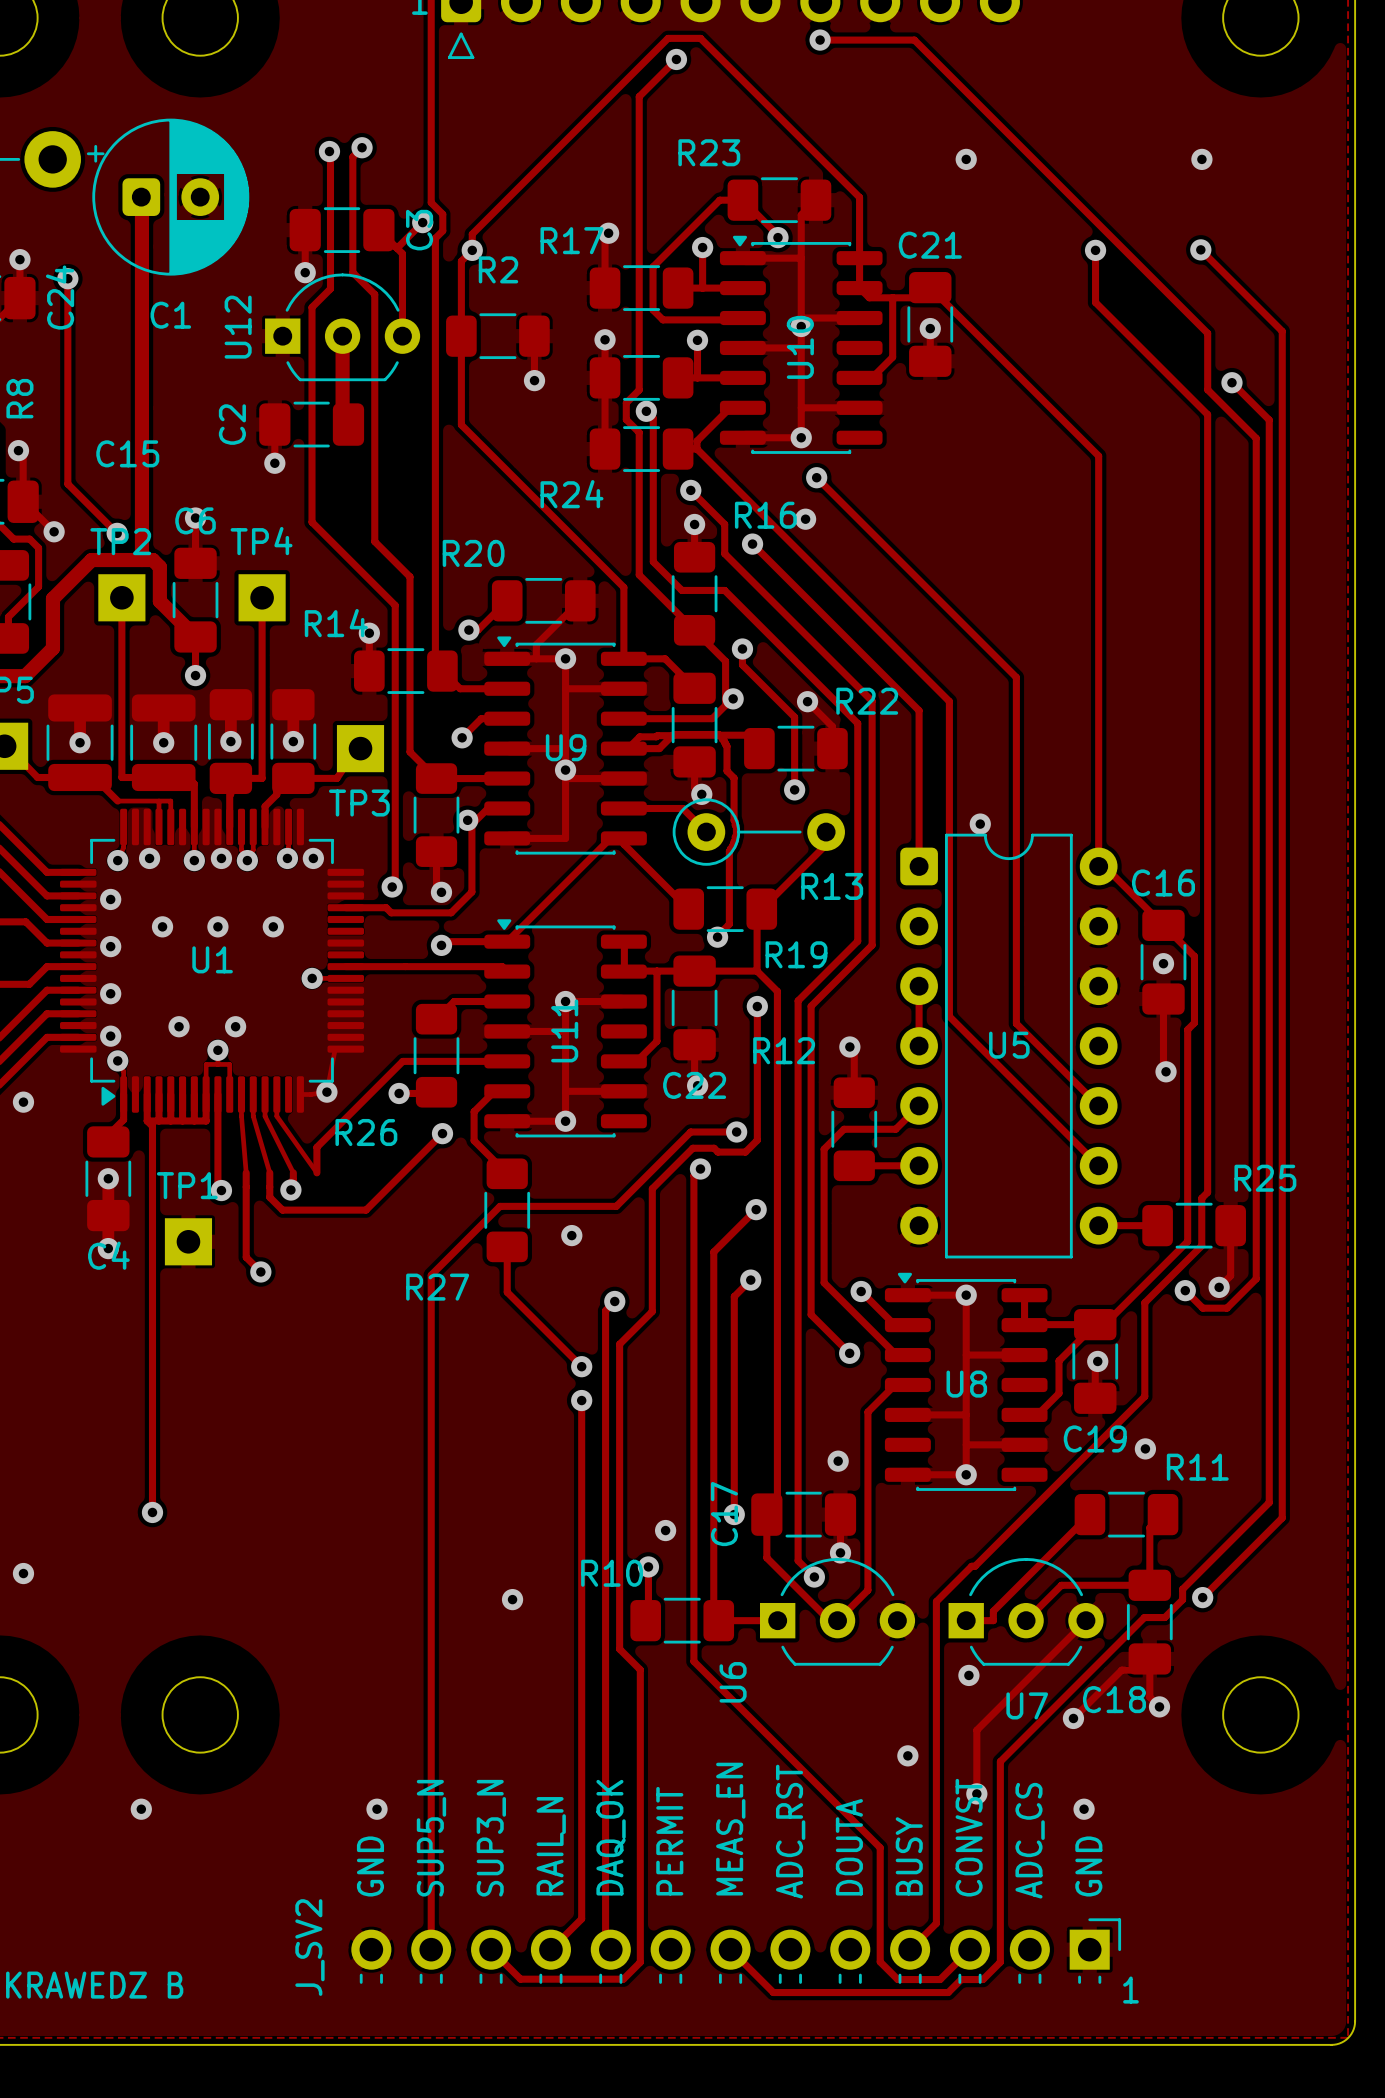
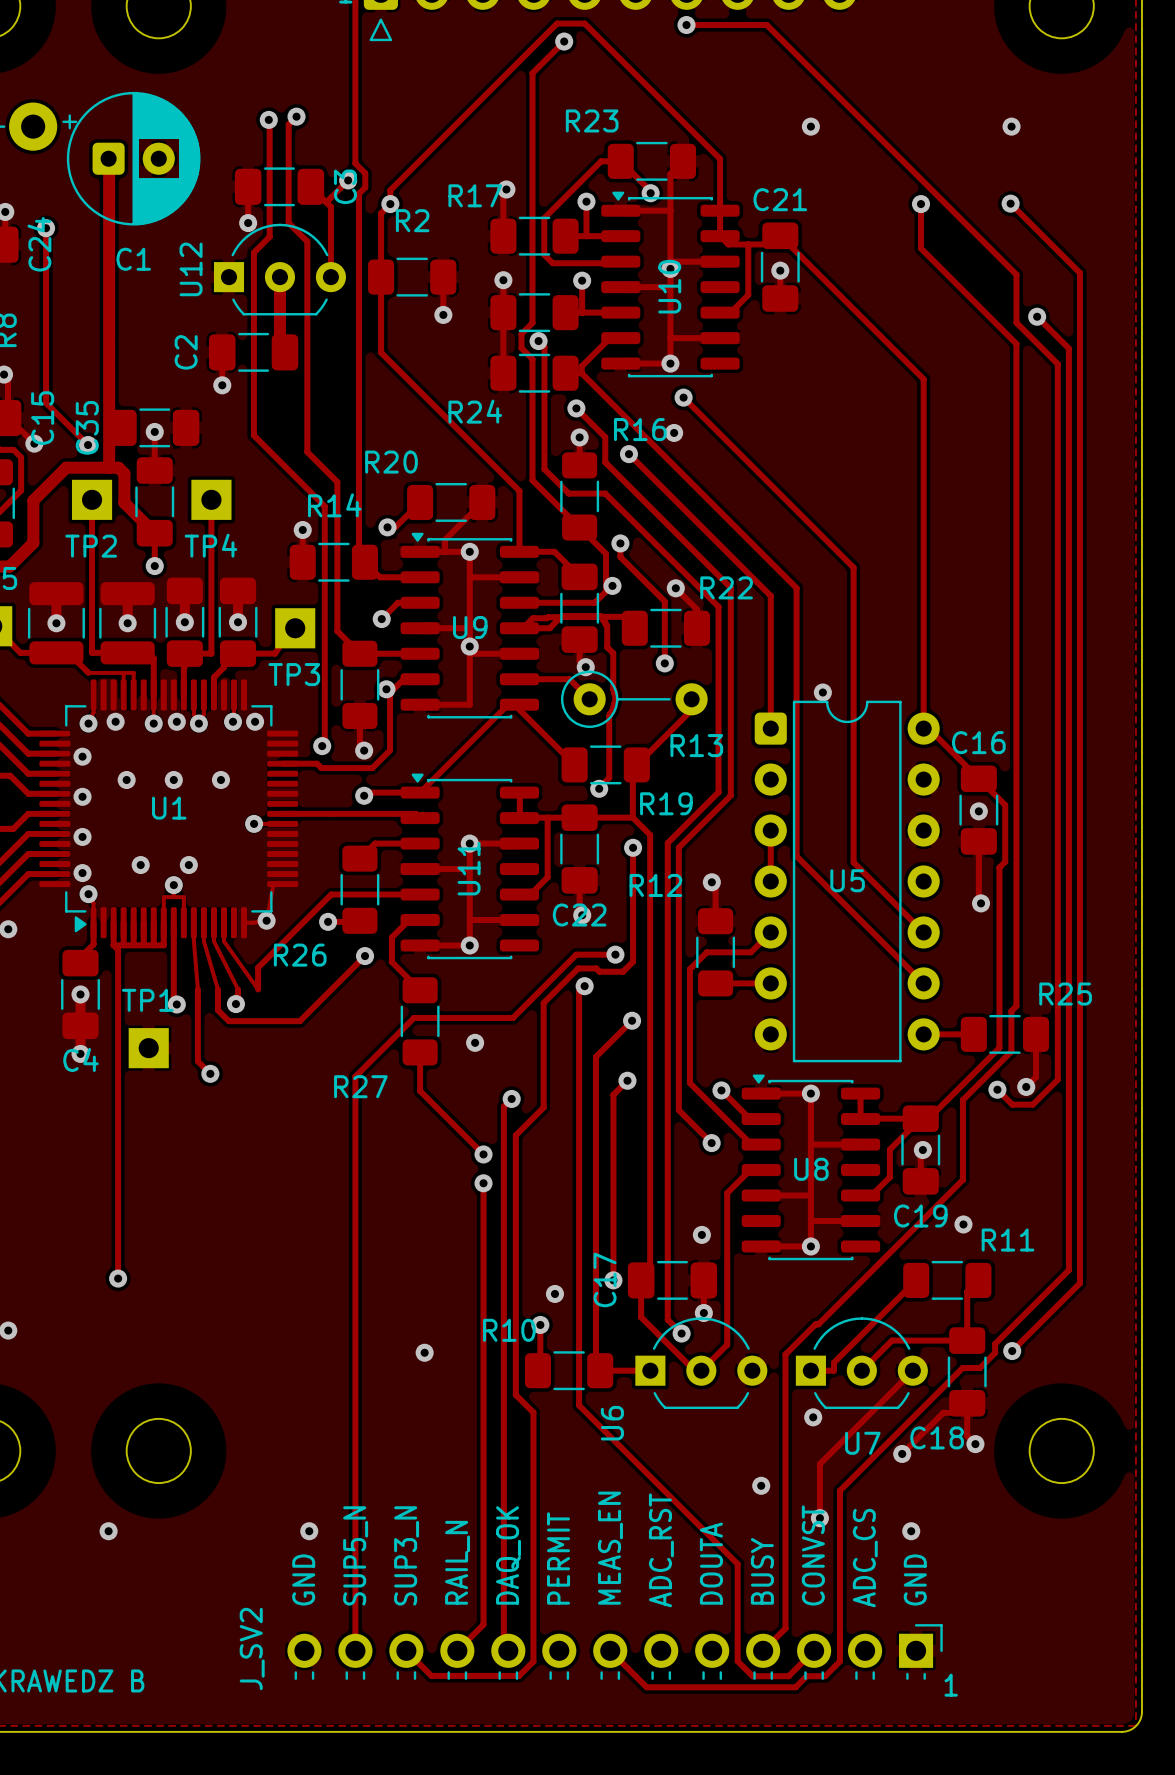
C15 name rotation: 0° (127, 453) -> 90° counterclockwise (42, 418)
C35: none -> (154, 427)
C6 name: C6 (195, 520) -> none
TP2 name position: TP2 (120, 541) -> TP2 (91, 546)
TP4 name position: TP4 (261, 541) -> TP4 (210, 545)
R14 name position: R14 (336, 623) -> R14 (334, 505)

